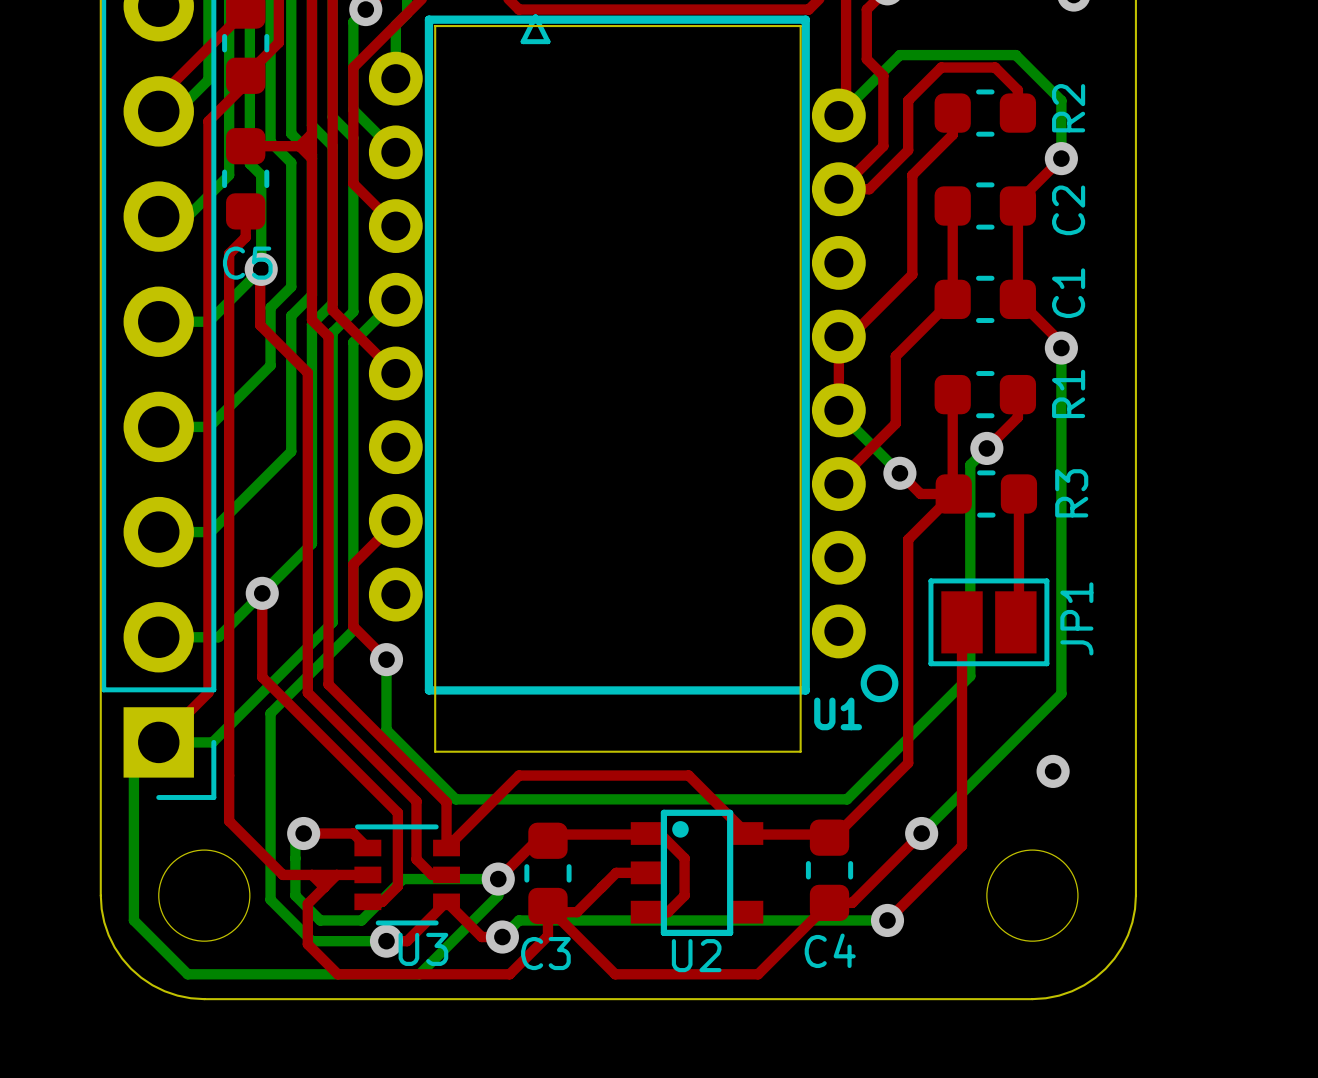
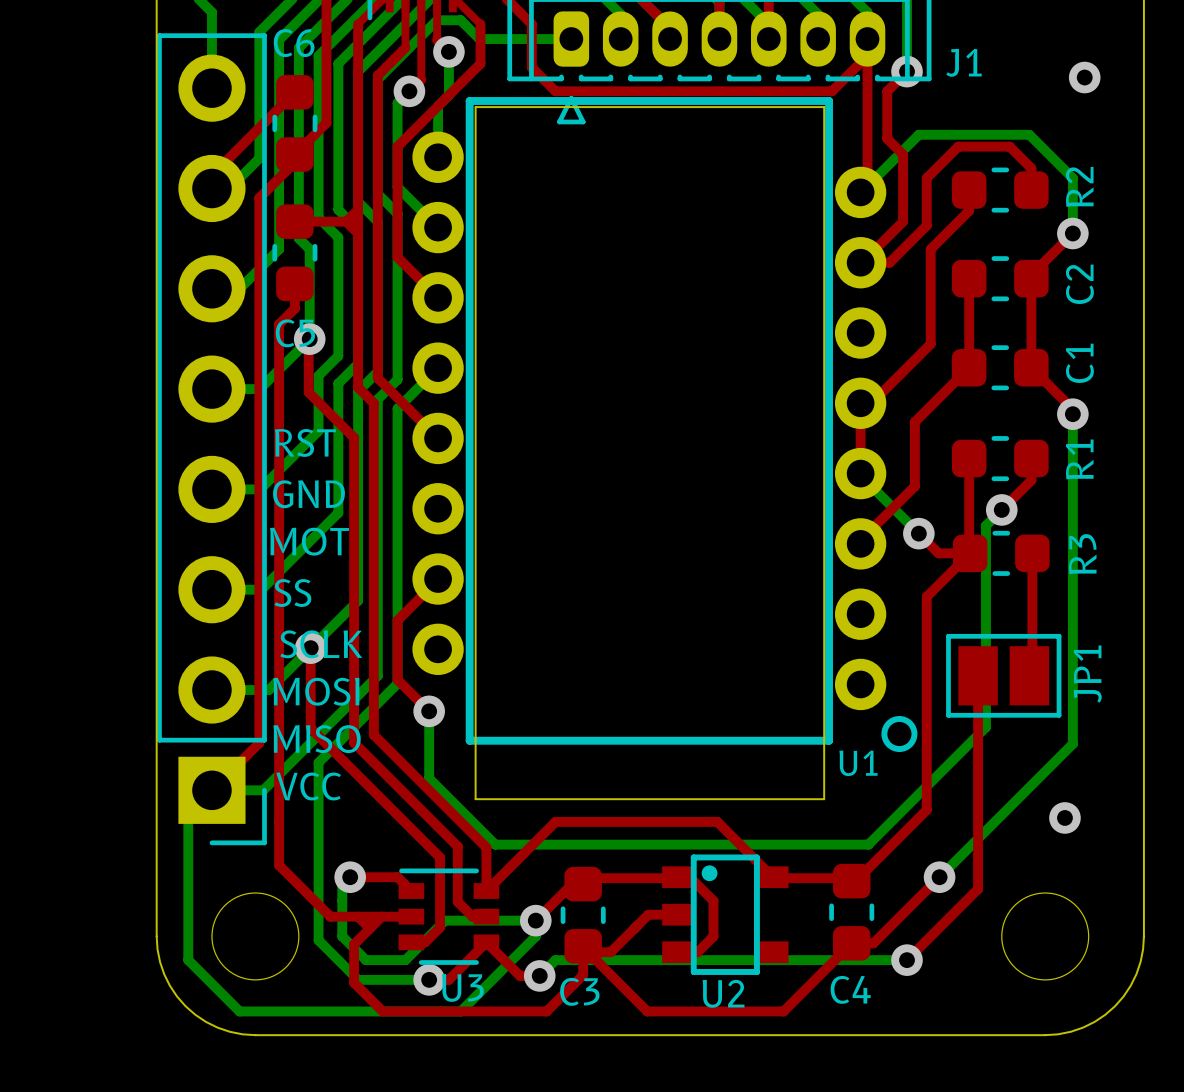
text: none -> RST (305, 442)
text: none -> GND (308, 494)
text: none -> MOT (309, 541)
text: none -> SS (292, 593)
text: none -> SCLK (321, 644)
text: none -> MOSI (316, 691)
text: none -> MISO (317, 739)
text: none -> VCC (308, 786)

